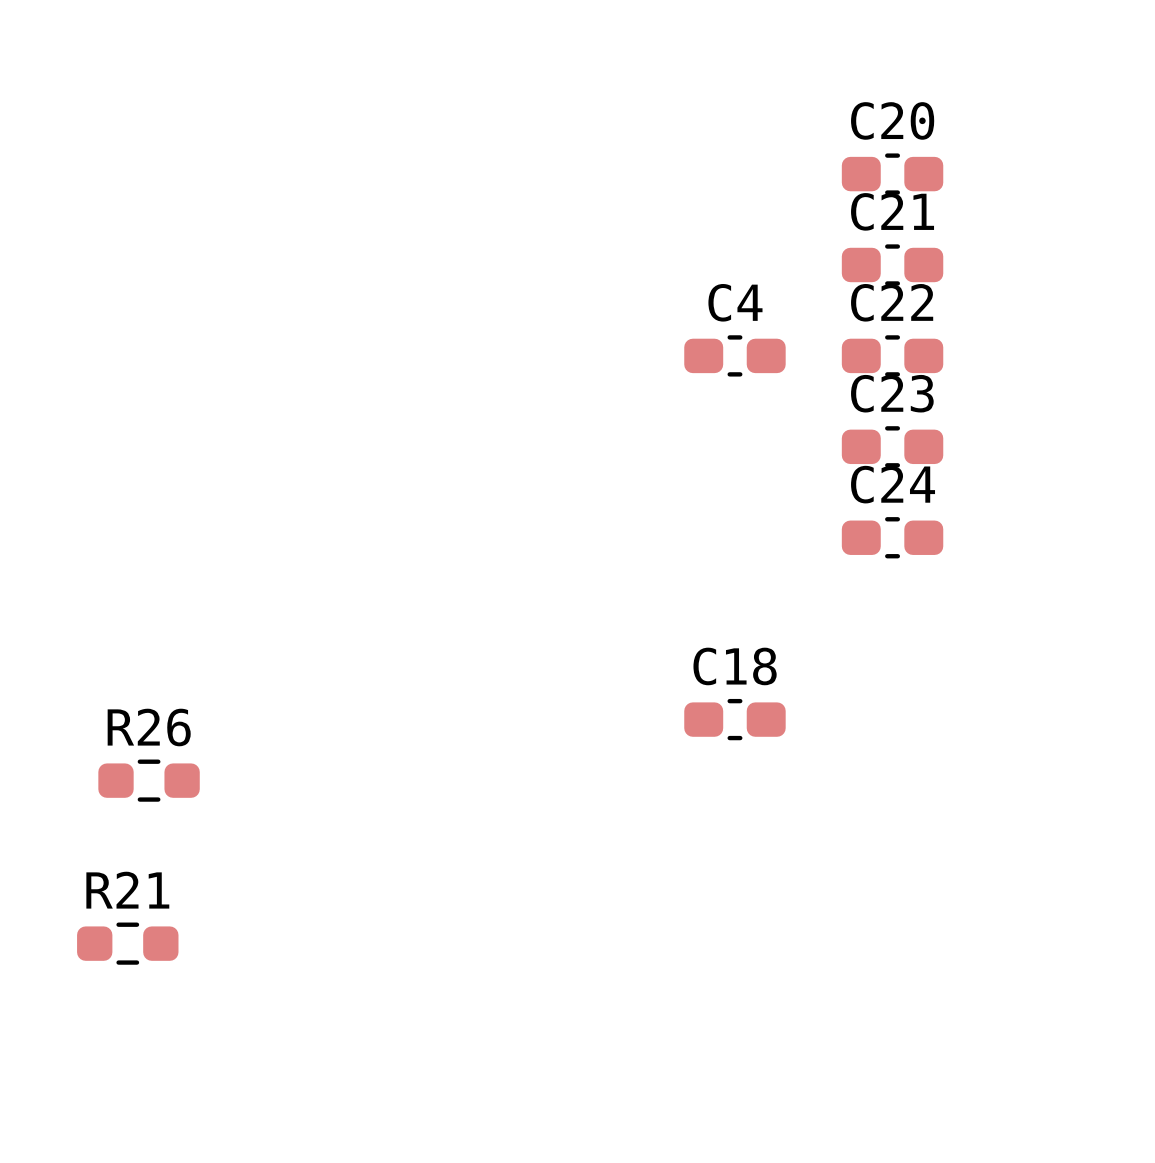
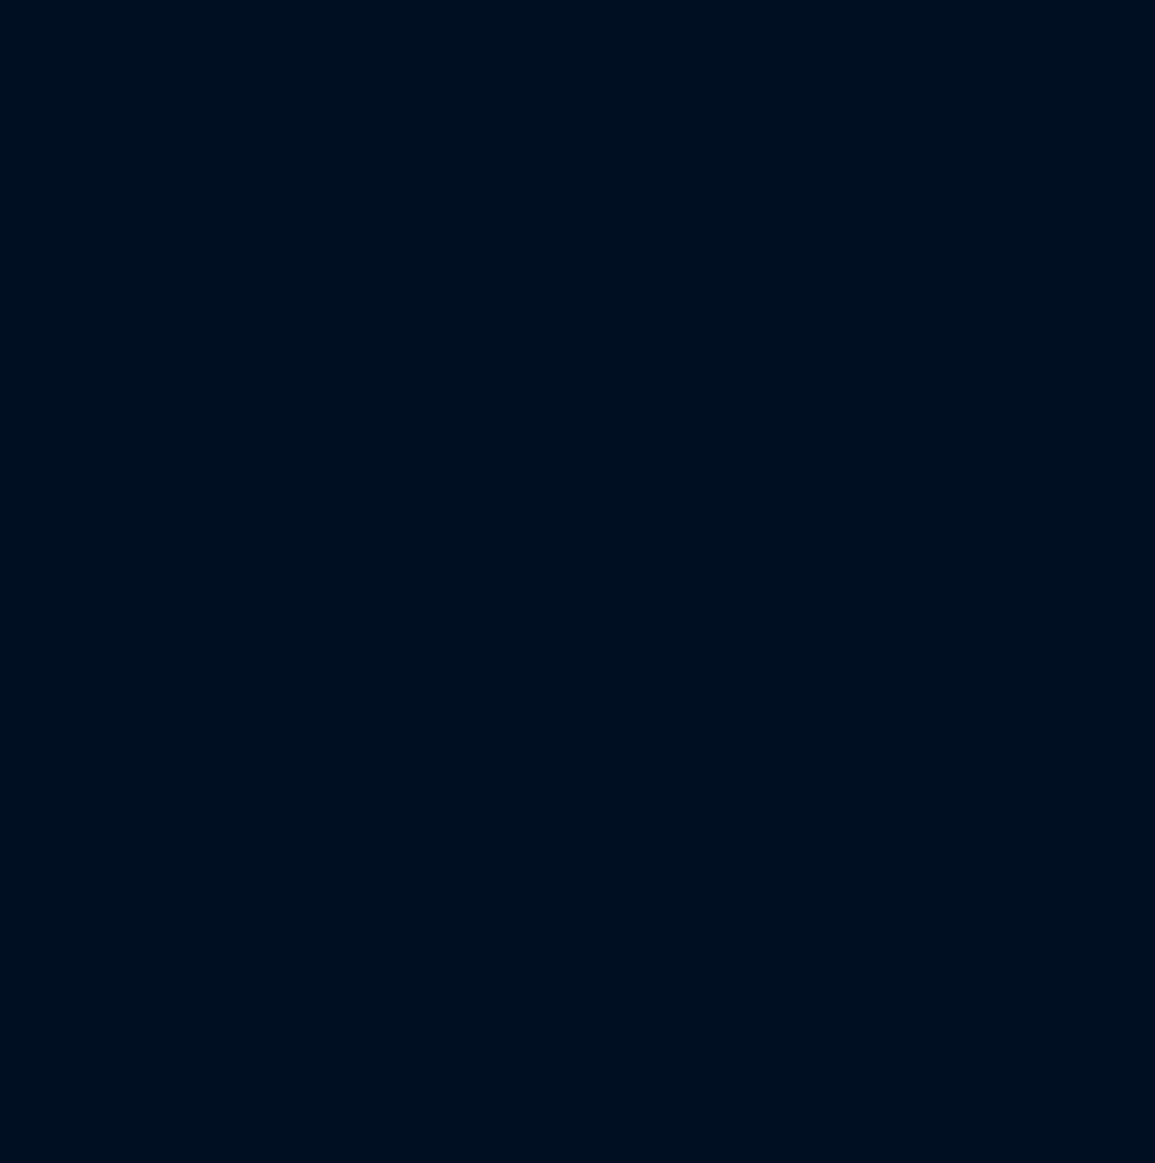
C20: (892, 174) -> none
C21: (892, 264) -> none
C4: (734, 355) -> none
C22: (892, 355) -> none
C23: (892, 446) -> none
C24: (892, 537) -> none
C18: (734, 719) -> none
R26: (149, 780) -> none
R21: (127, 943) -> none

